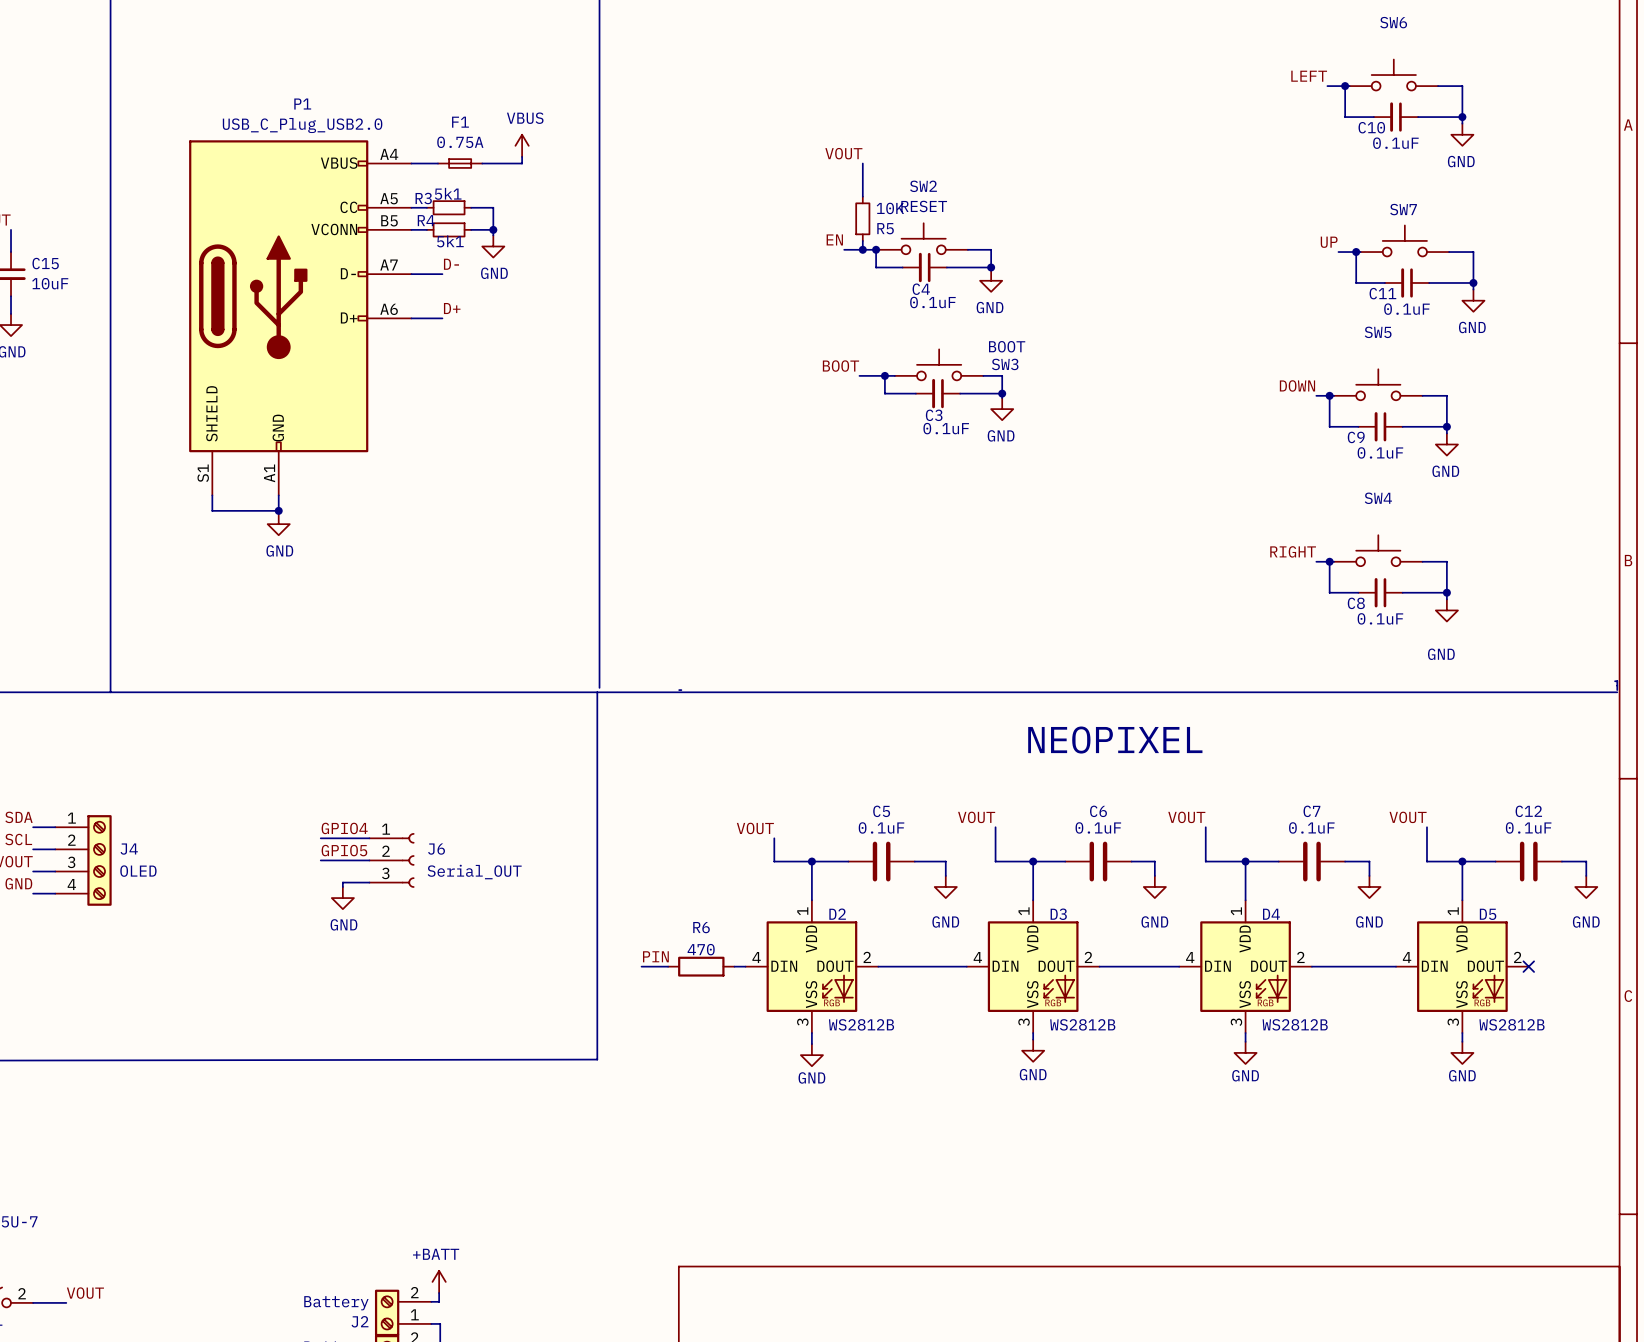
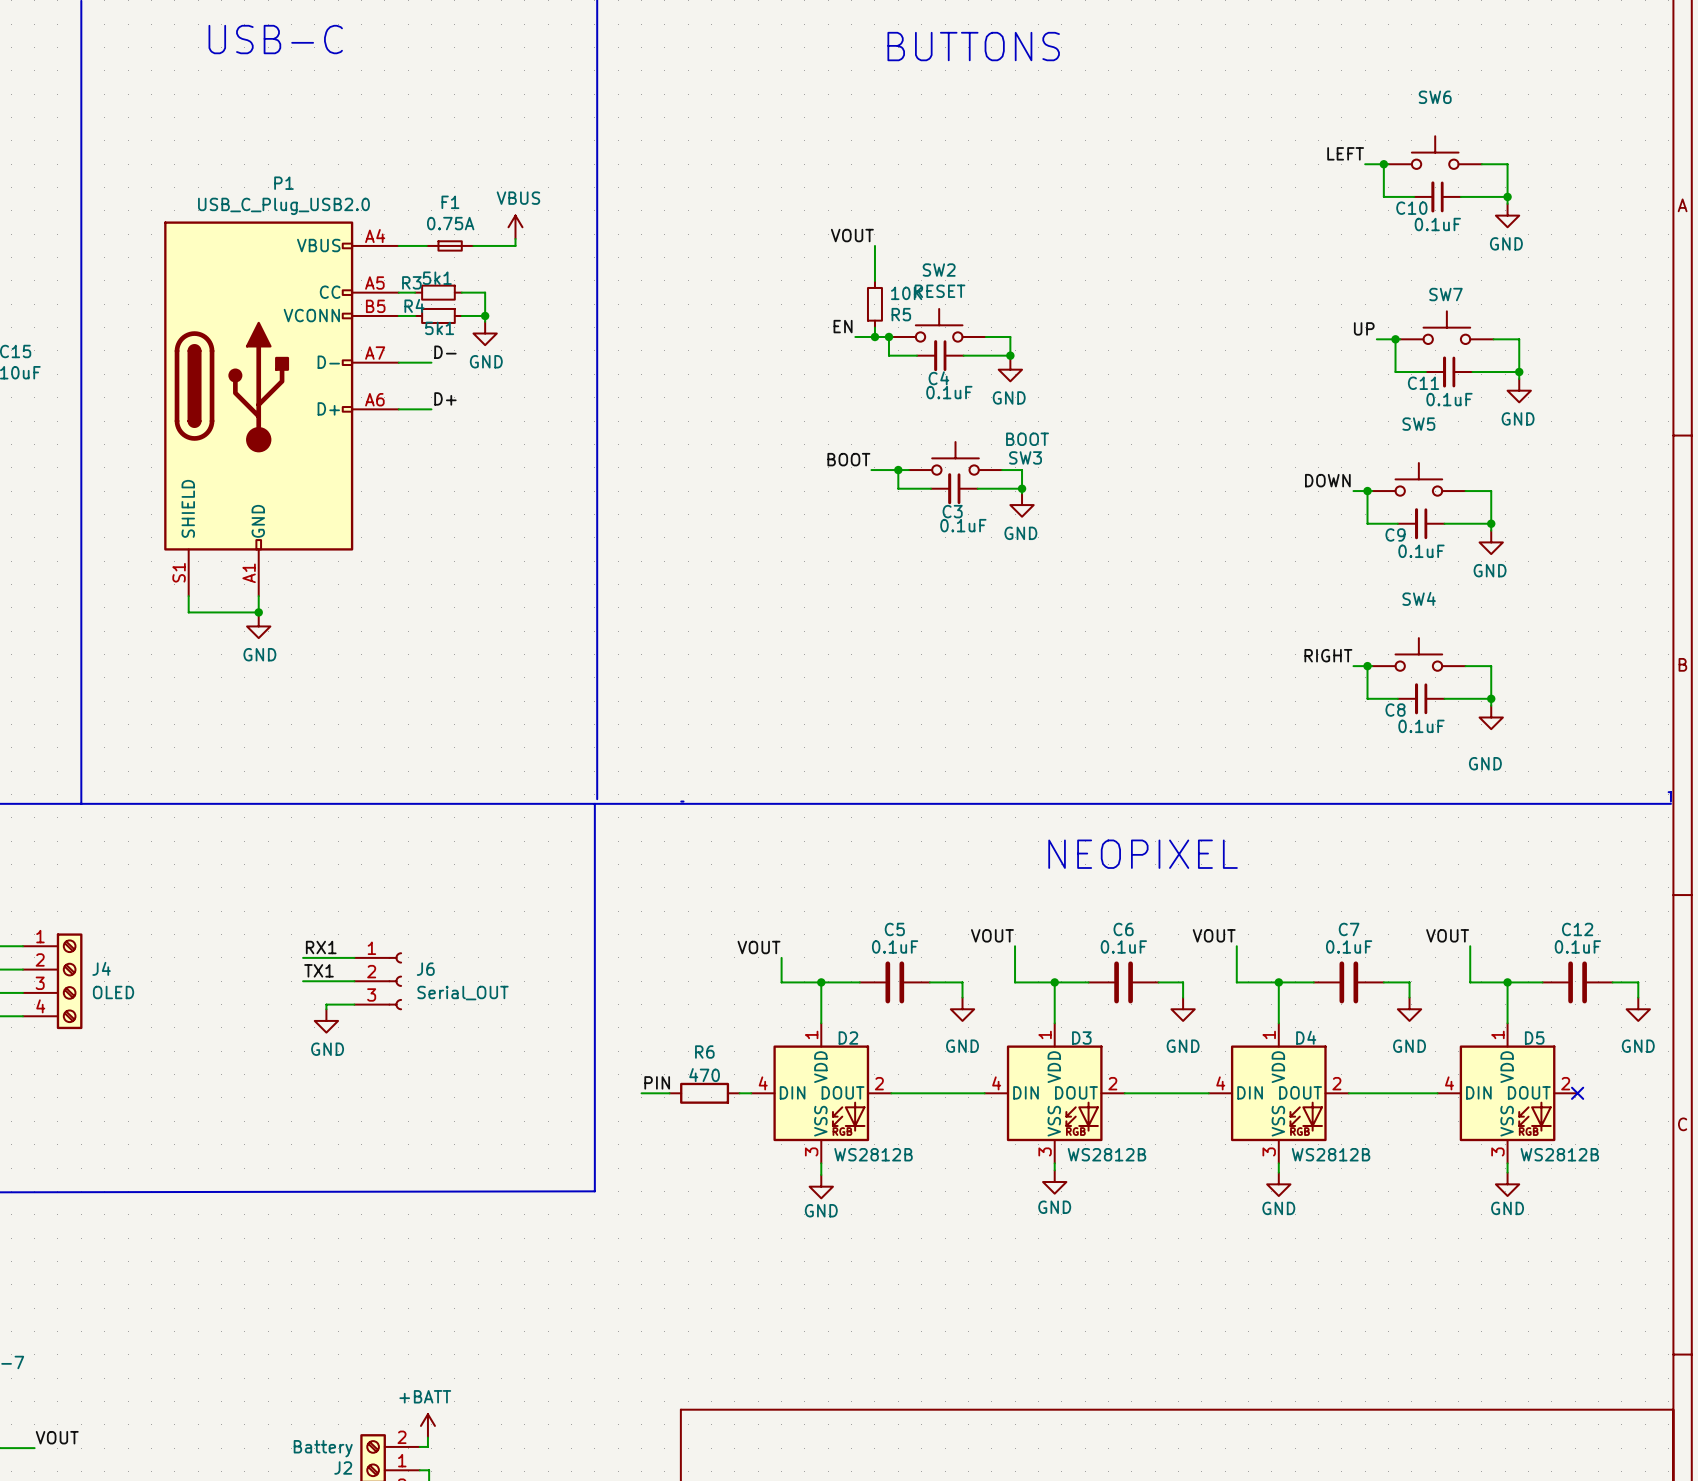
label: GPIO4 (344, 828) -> RX1 (321, 947)
label: GPIO5 (344, 850) -> TX1 (319, 970)

